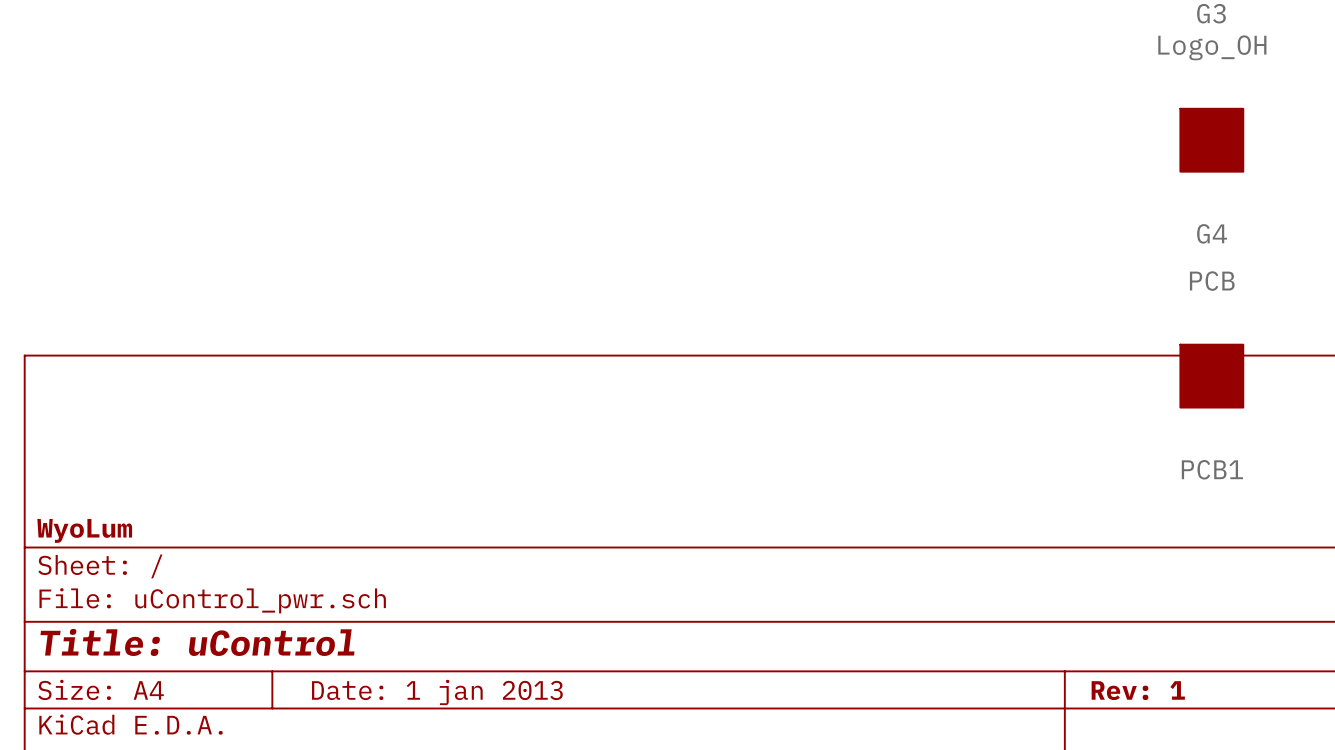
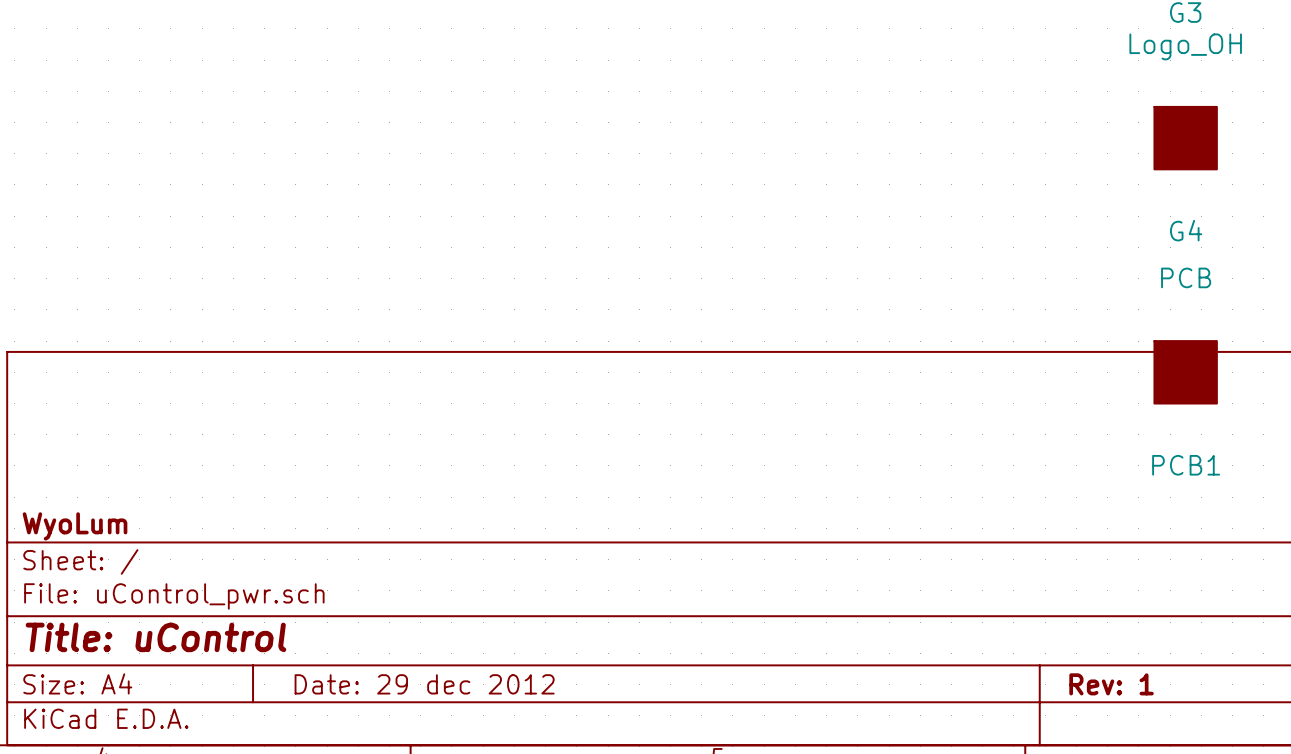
title block: Date: 1 jan 2013 (437, 692) -> Date: 29 dec 2012 (424, 684)

